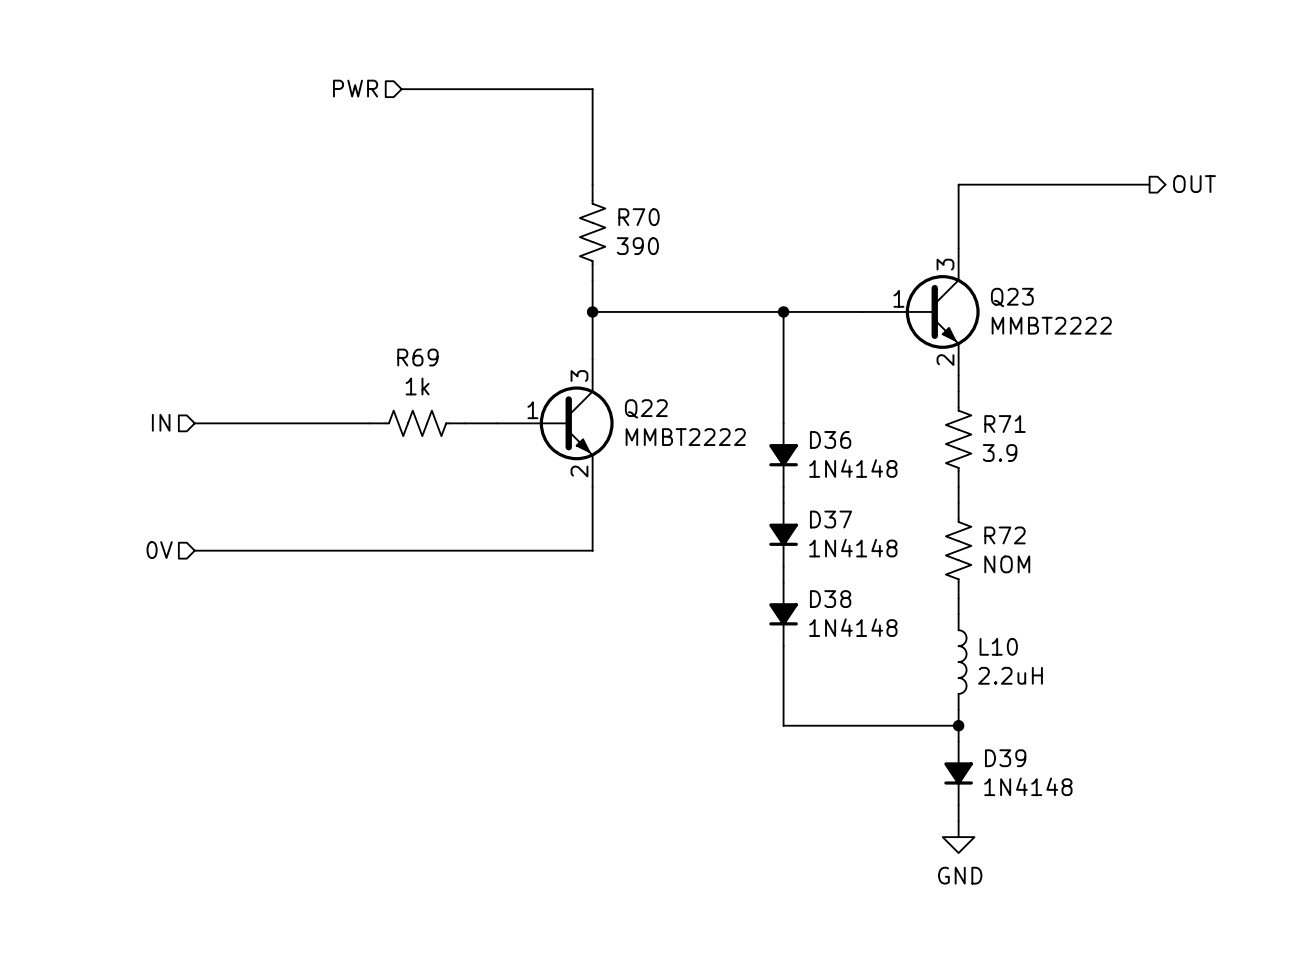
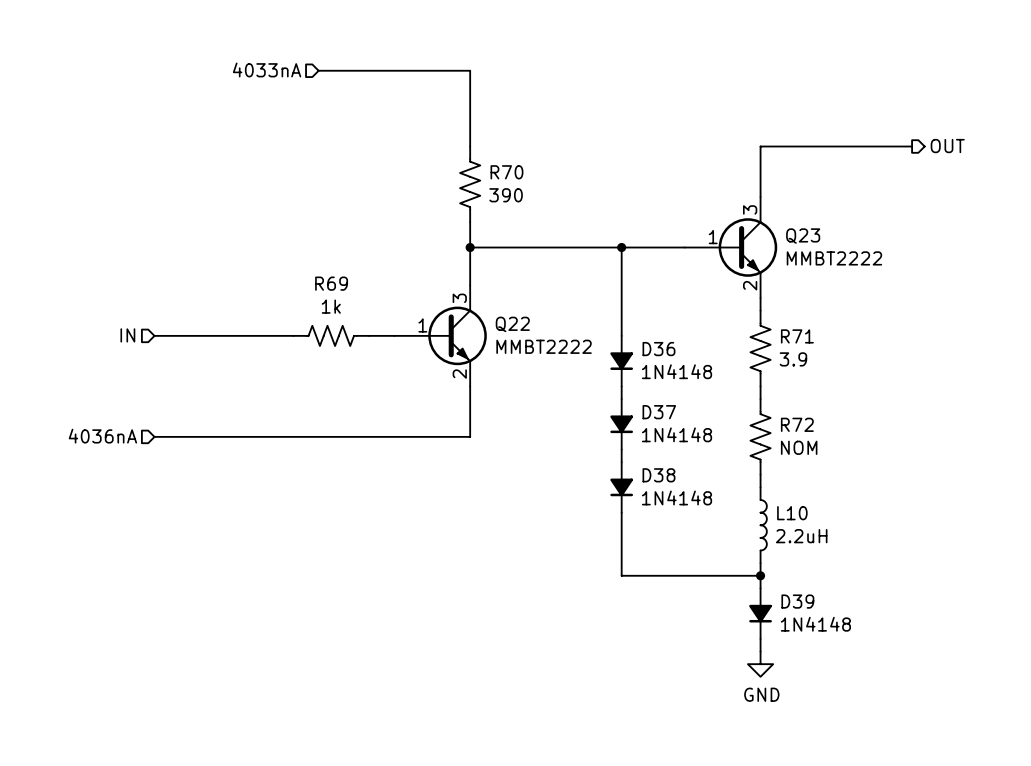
hierarchical label: PWR (355, 88) -> 4033nA (267, 69)
hierarchical label: 0V (159, 550) -> 4036nA (102, 436)

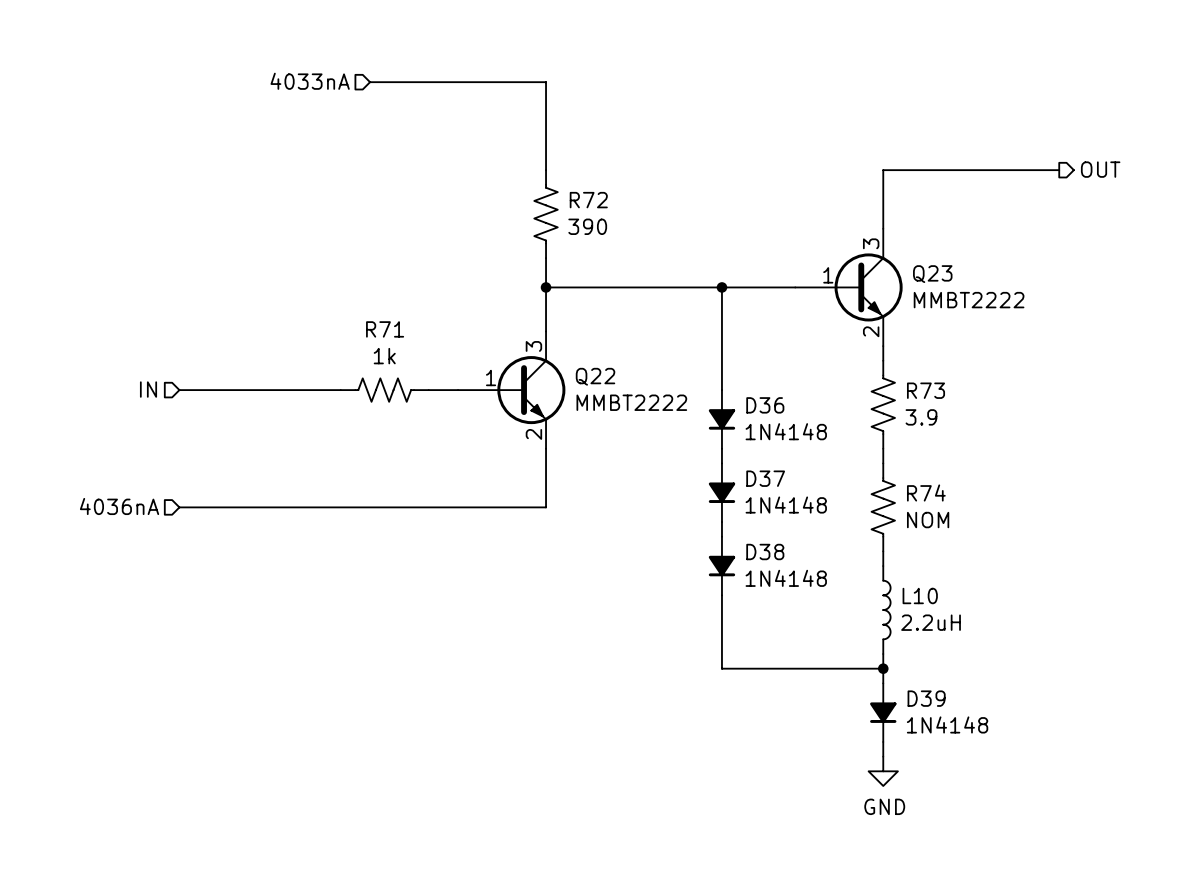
R70 name: R70 (506, 172) -> R72 (588, 200)
R69 name: R69 (331, 283) -> R71 (385, 329)
R71 name: R71 (797, 336) -> R73 (926, 390)
R72 name: R72 (797, 424) -> R74 (926, 493)

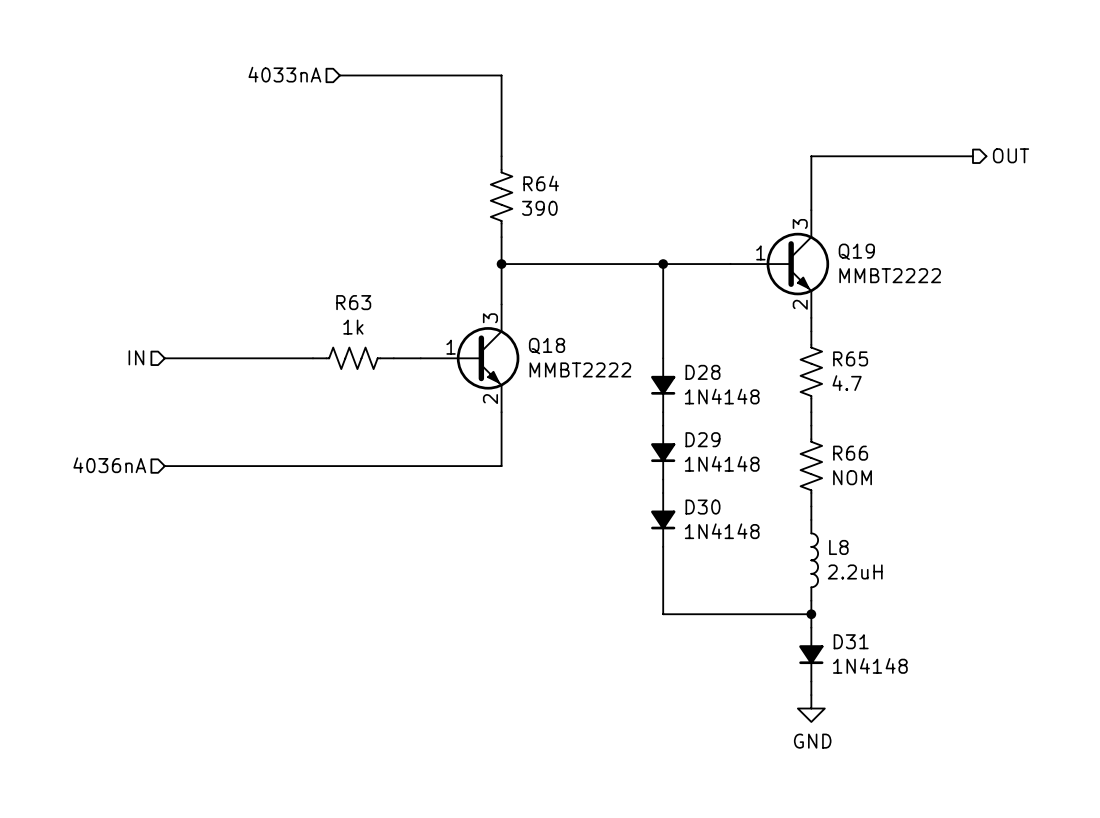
R72 name: R72 (588, 200) -> R64 (541, 183)
Q23 name: Q23 (932, 274) -> Q19 (856, 251)
R71 name: R71 (385, 329) -> R63 (353, 302)
Q22 name: Q22 (595, 376) -> Q18 (547, 346)
R73 name: R73 (926, 390) -> R65 (850, 358)
D36 name: D36 (765, 405) -> D28 (702, 372)
R73 value: 3.9 (921, 417) -> 4.7 (847, 383)
D37 name: D37 (765, 478) -> D29 (702, 439)
R74 name: R74 (926, 493) -> R66 (850, 453)
D38 name: D38 (765, 552) -> D30 (702, 507)
L10 name: L10 (920, 595) -> L8 (838, 547)
D39 name: D39 (926, 698) -> D31 (851, 641)

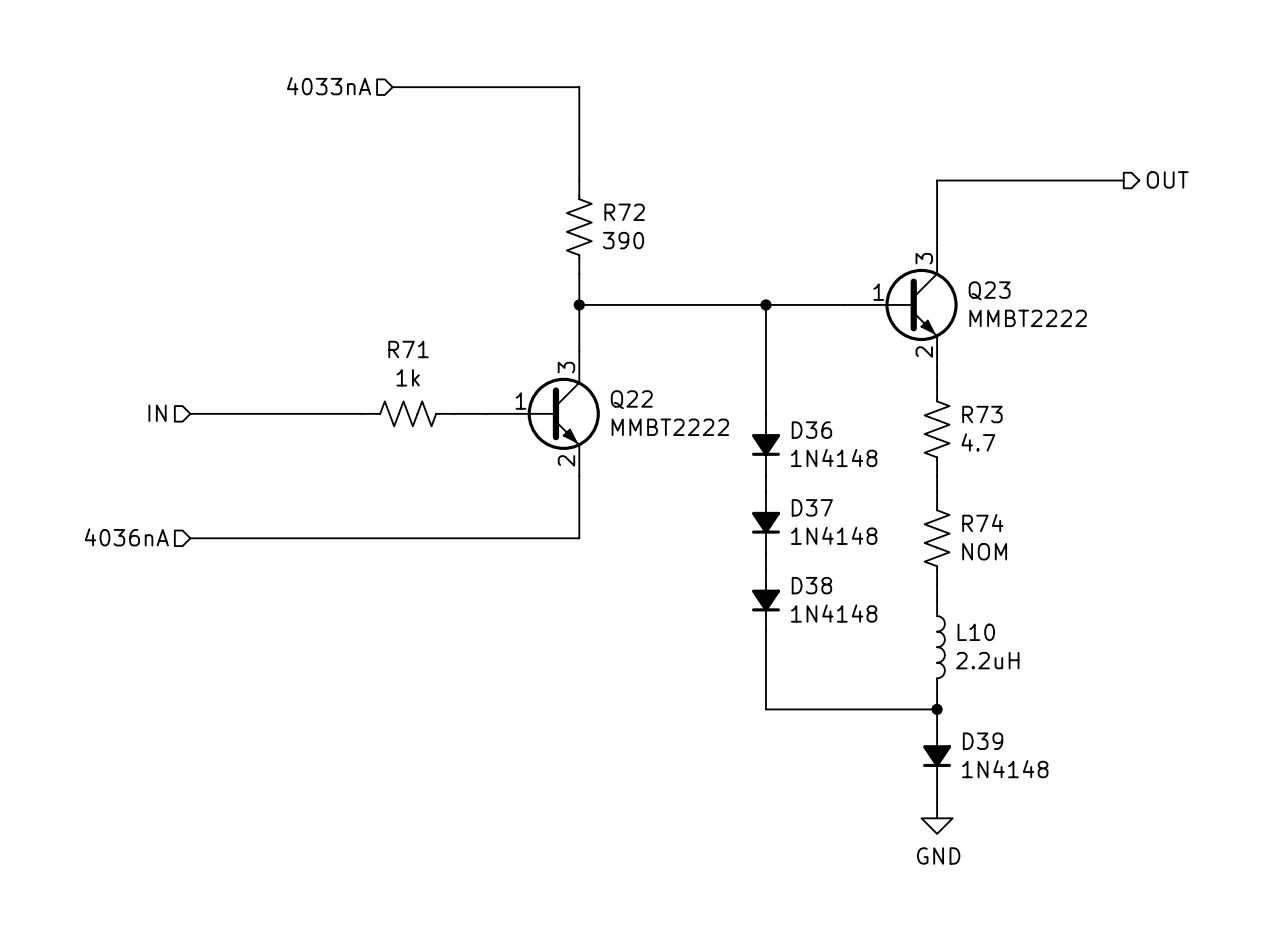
R64 name: R64 (541, 183) -> R72 (624, 212)
Q19 name: Q19 (856, 251) -> Q23 (989, 290)
R63 name: R63 (353, 302) -> R71 (408, 349)
Q18 name: Q18 (547, 346) -> Q22 (631, 399)
R65 name: R65 (850, 358) -> R73 (982, 414)
D28 name: D28 (702, 372) -> D36 (811, 430)
D29 name: D29 (702, 439) -> D37 (812, 507)
R66 name: R66 (850, 453) -> R74 (982, 523)
D30 name: D30 (702, 507) -> D38 (811, 585)
L8 name: L8 (838, 547) -> L10 (976, 632)
D31 name: D31 (851, 641) -> D39 (983, 741)

